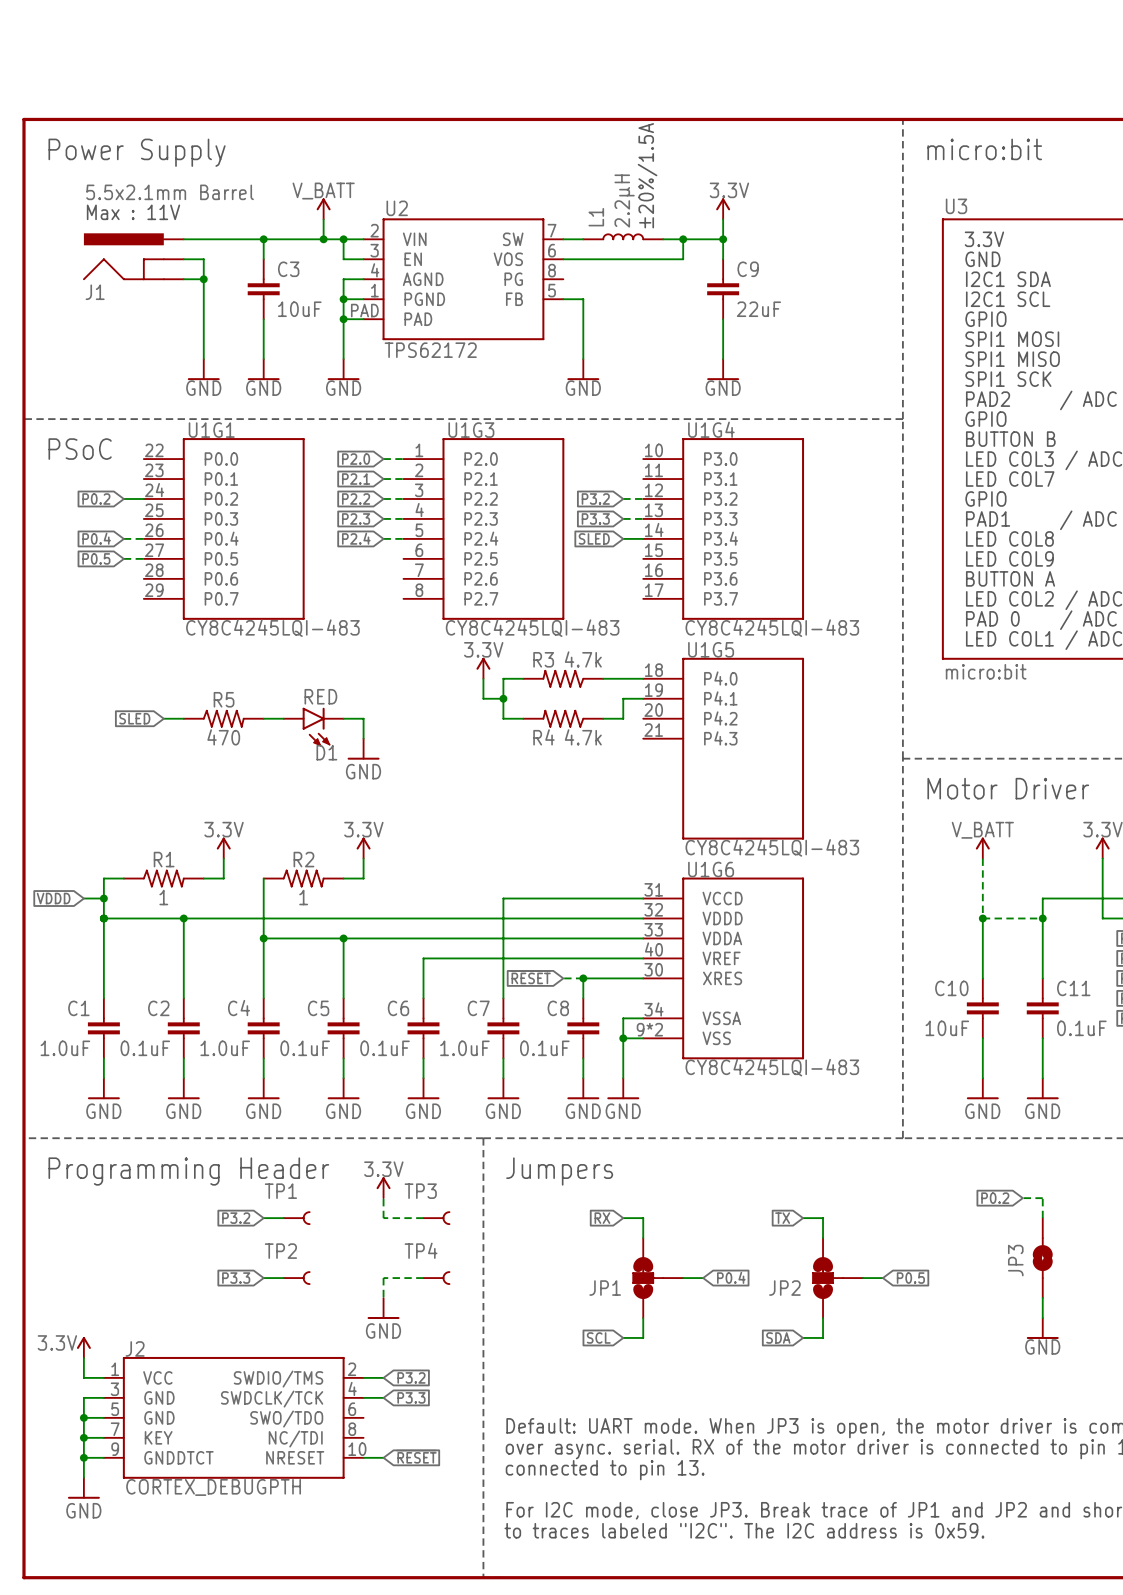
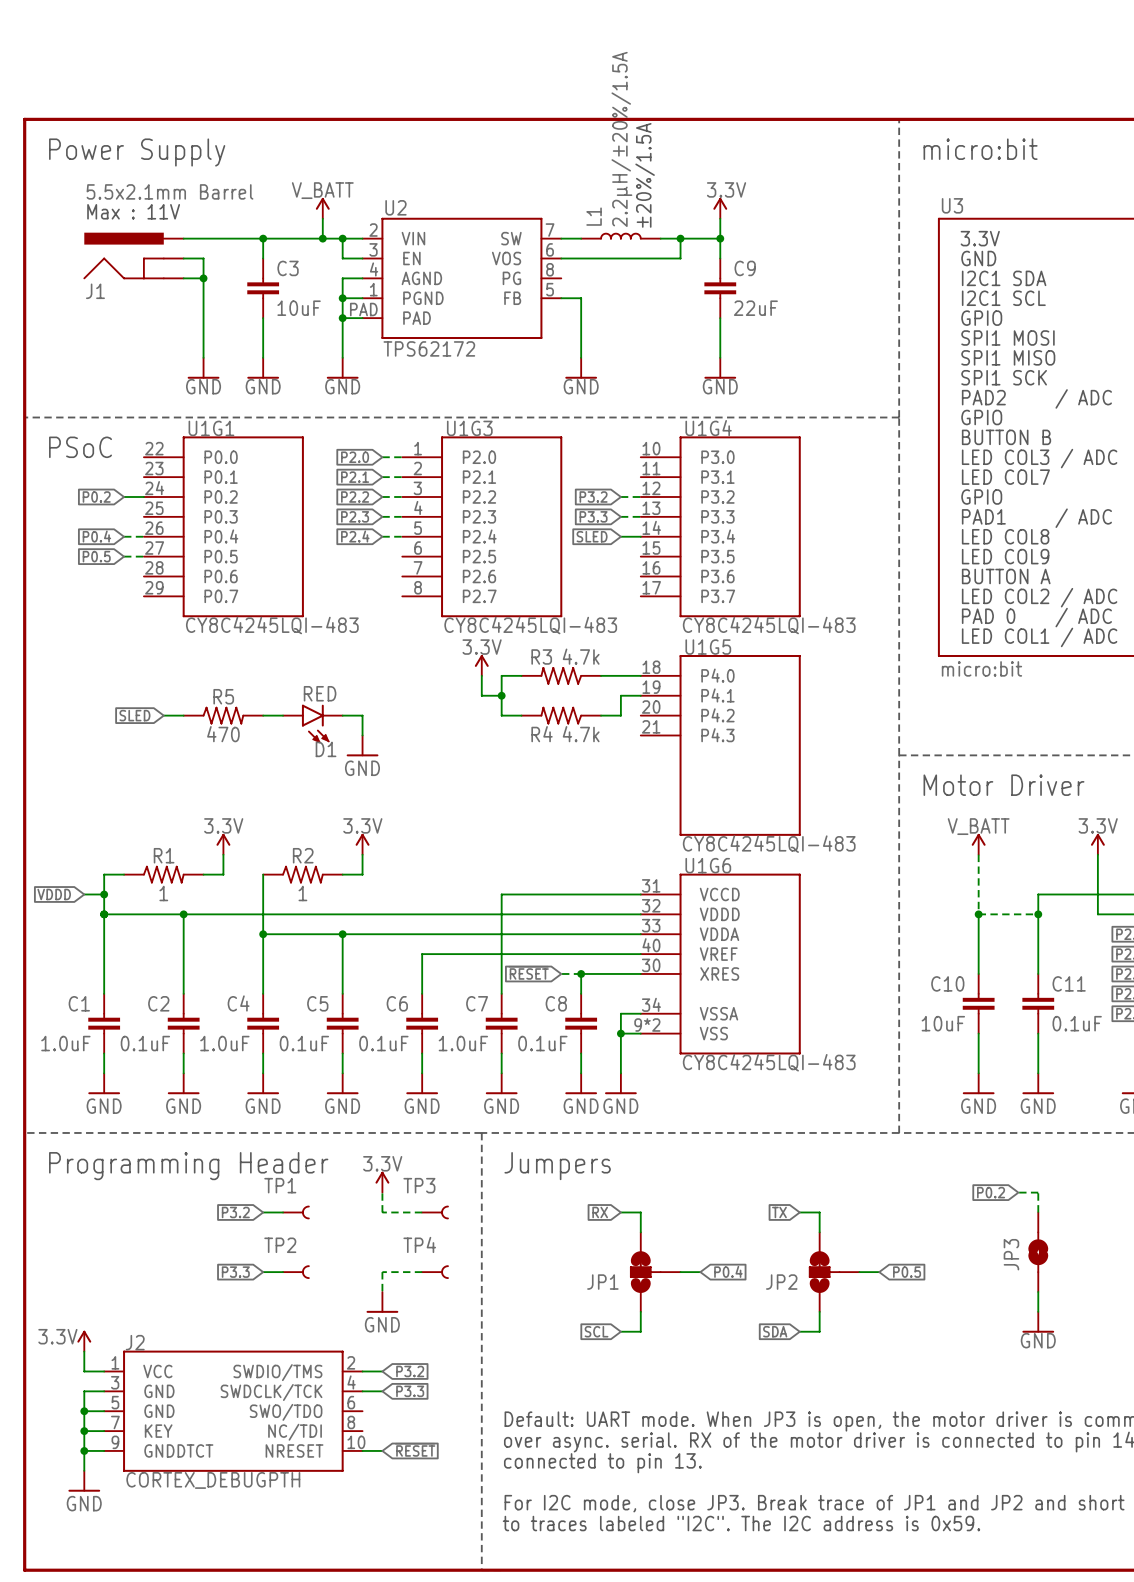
L1 value: 2.2µH (624, 201) -> 2.2µH/±20%/1.5A (621, 139)

